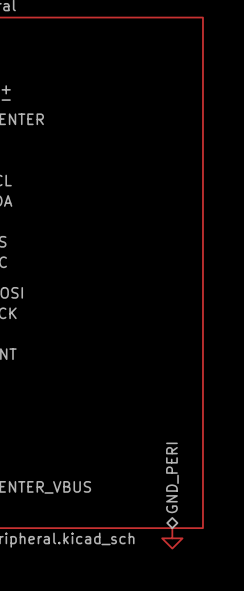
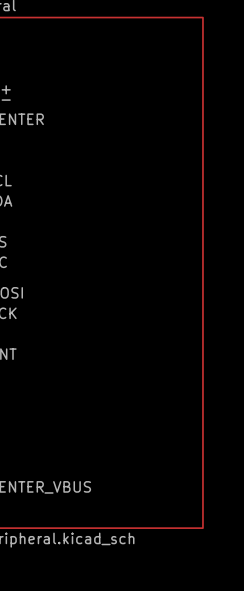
sheet pin: GND_PERI (172, 477) -> none
power symbol: (172, 538) -> none

